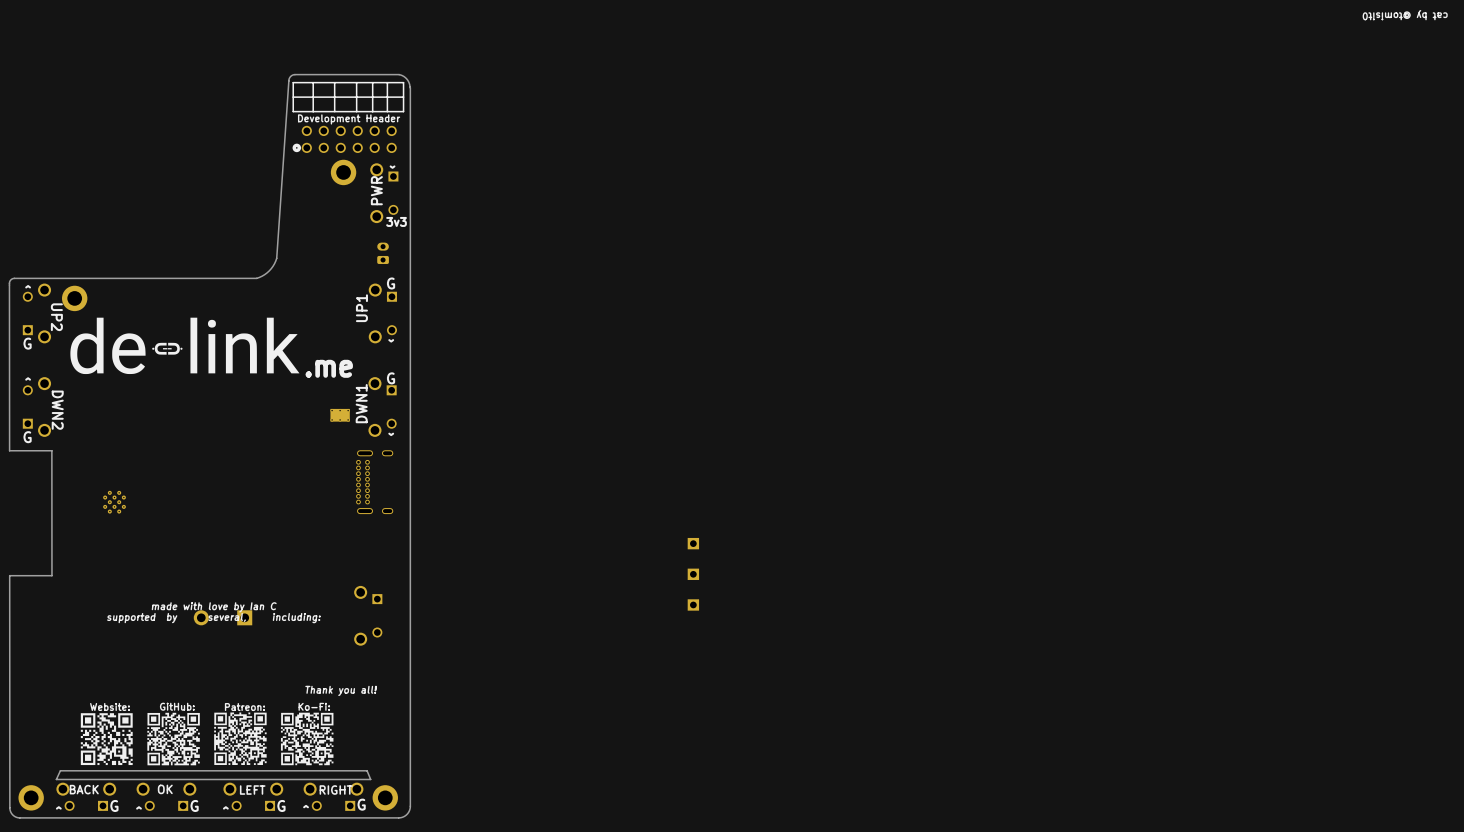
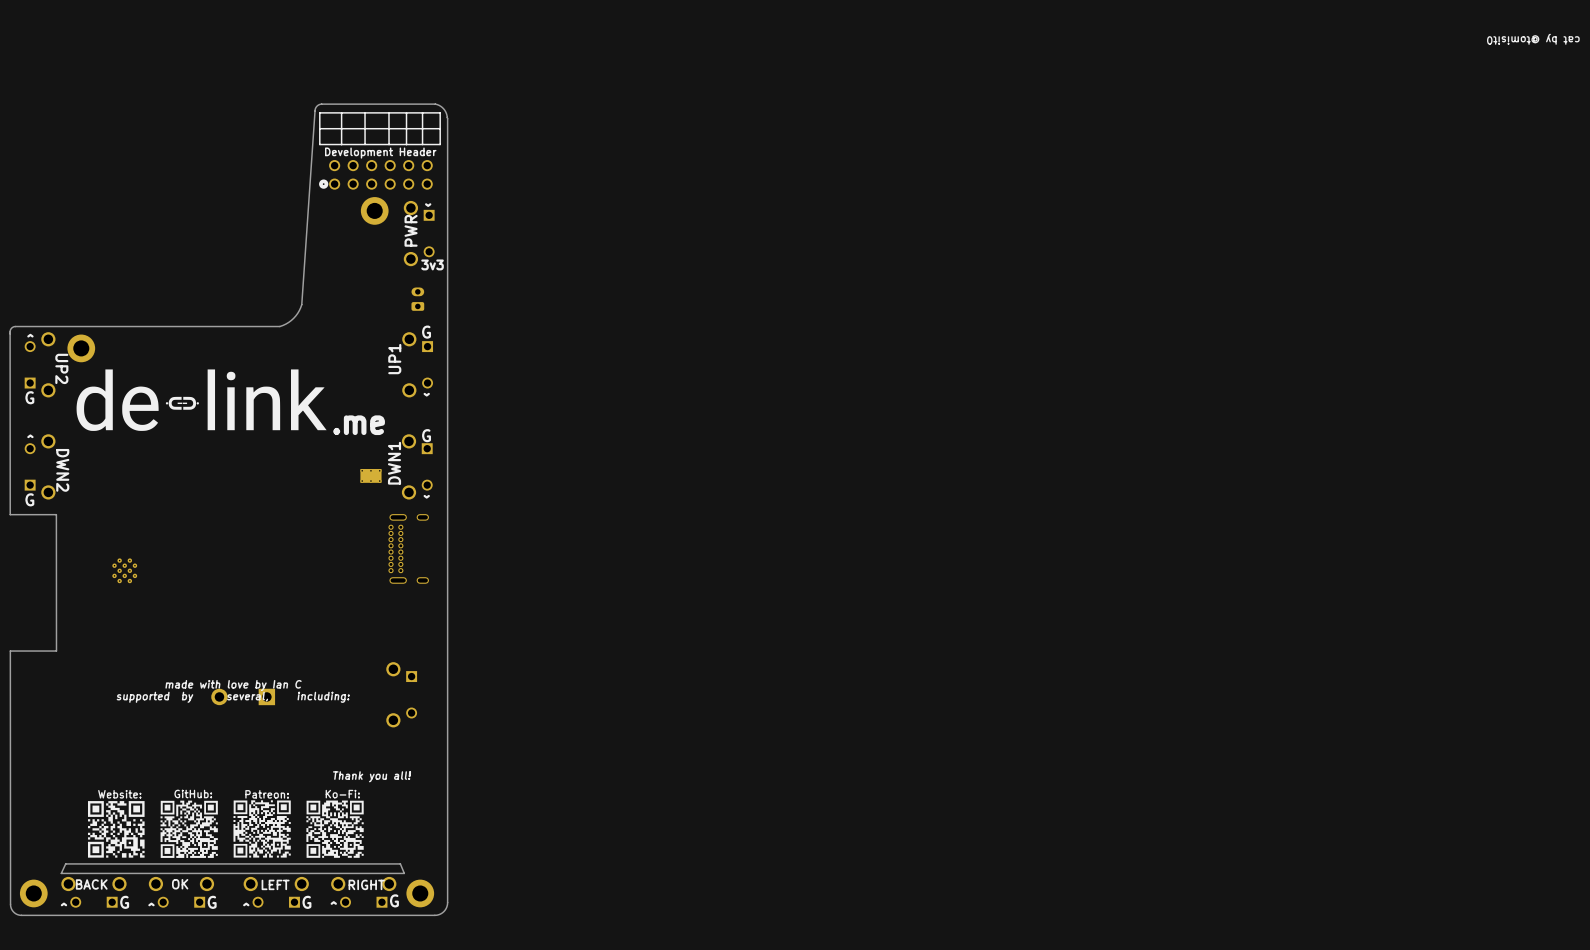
part: (693, 543) -> none
part: (693, 574) -> none
part: (693, 604) -> none

